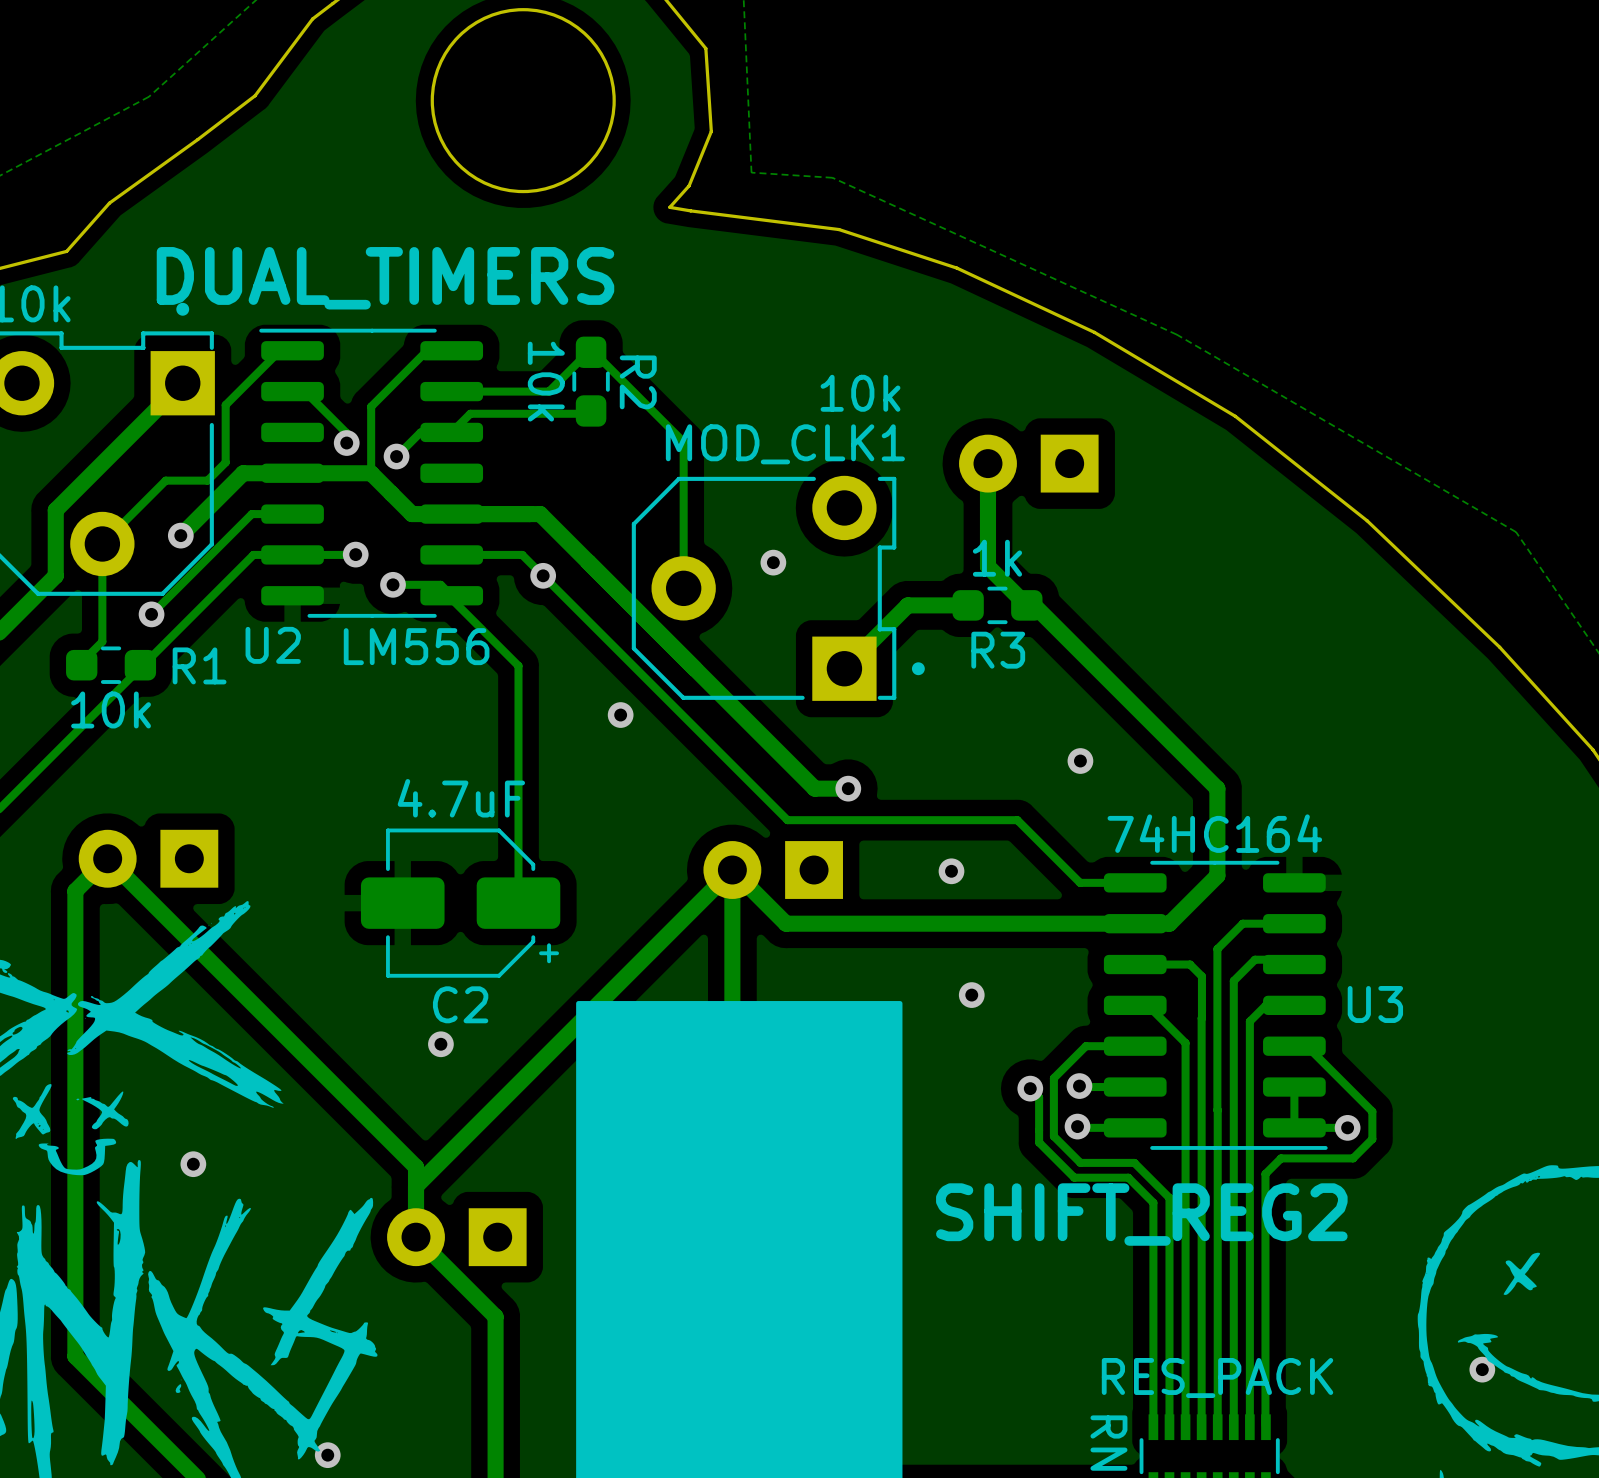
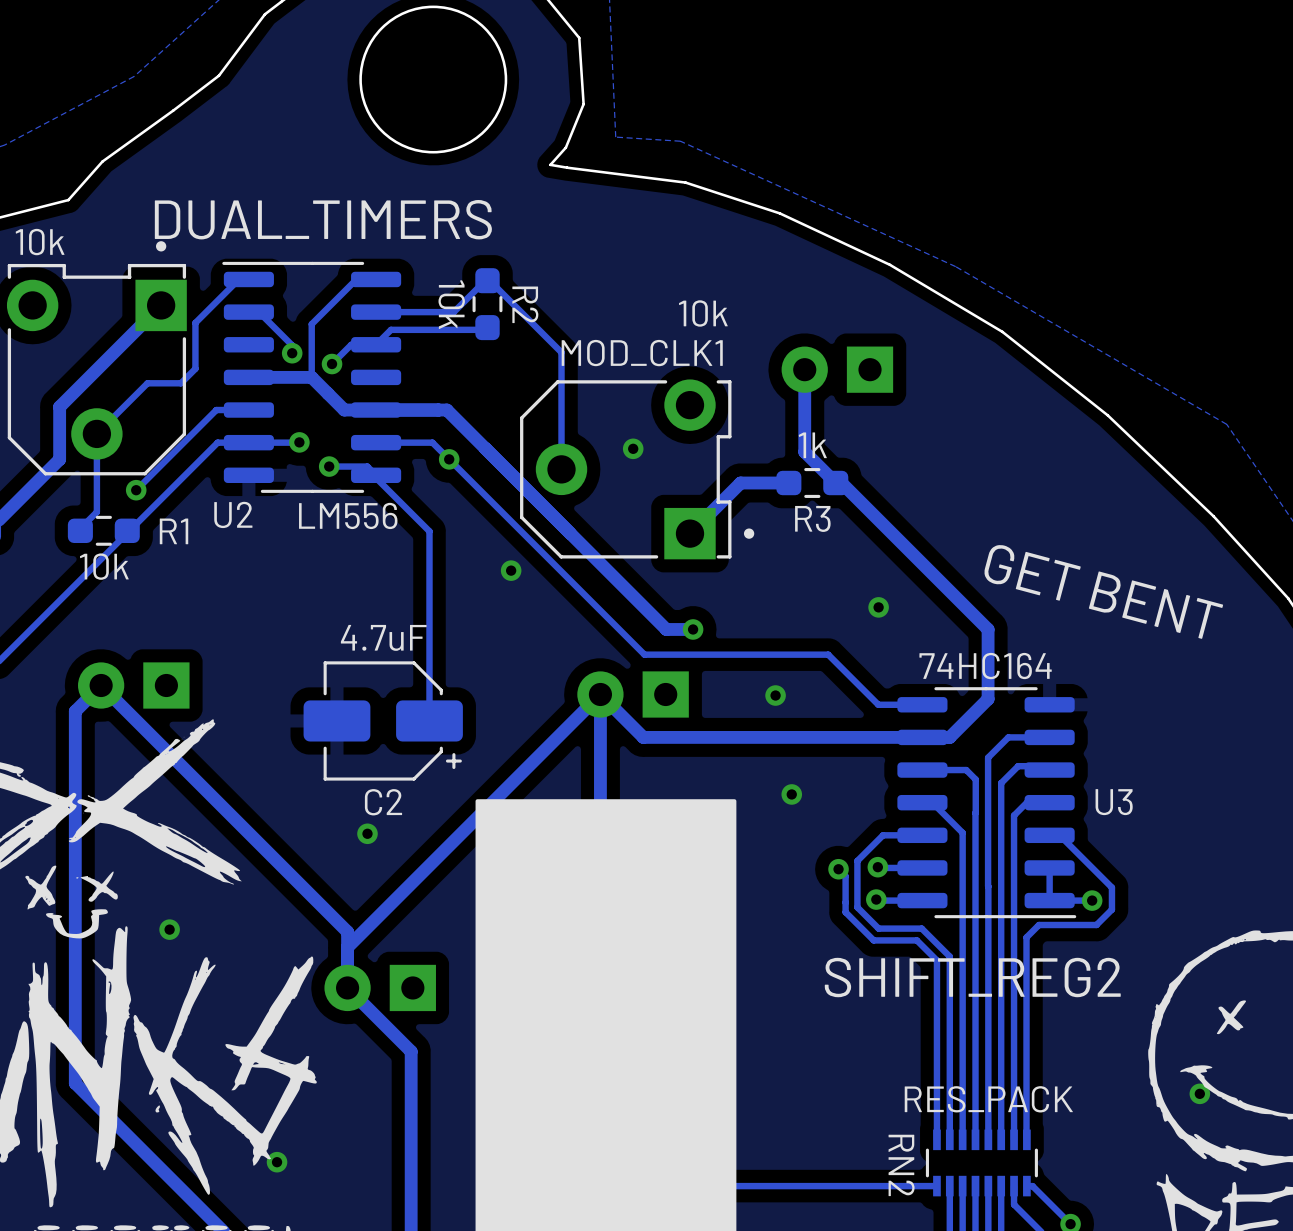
track: (292, 473) (243, 473) (180, 535) -> none
via: (180, 535) -> none
text: none -> GET BENT (1103, 591)
text position: SHIFT_REG2 (1141, 1214) -> SHIFT_REG2 (972, 977)

